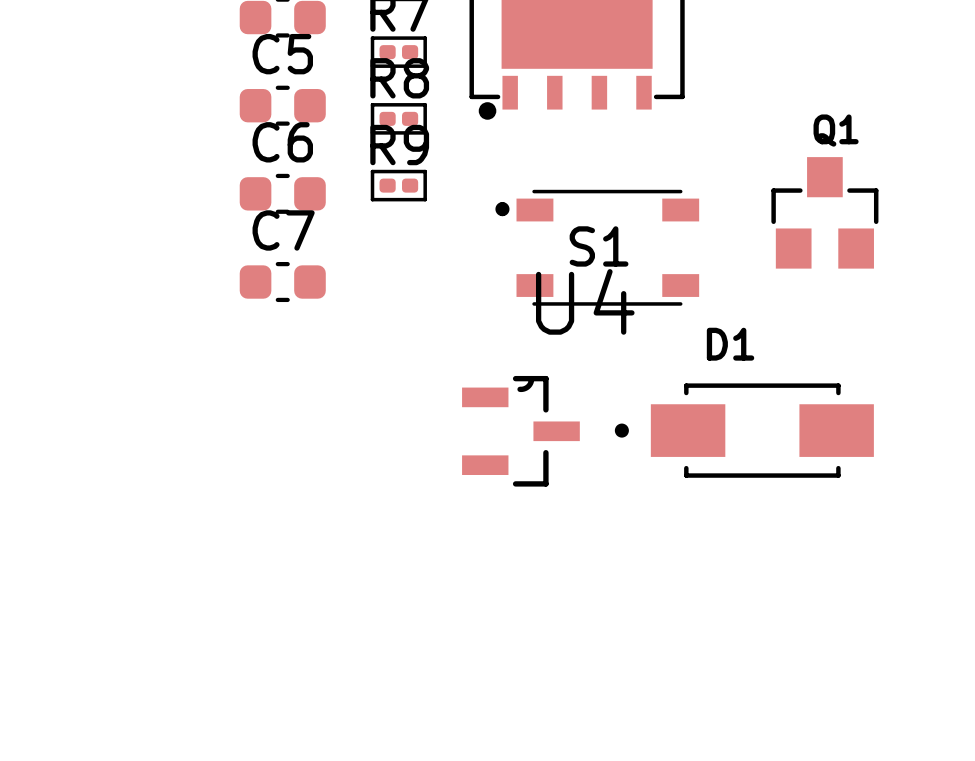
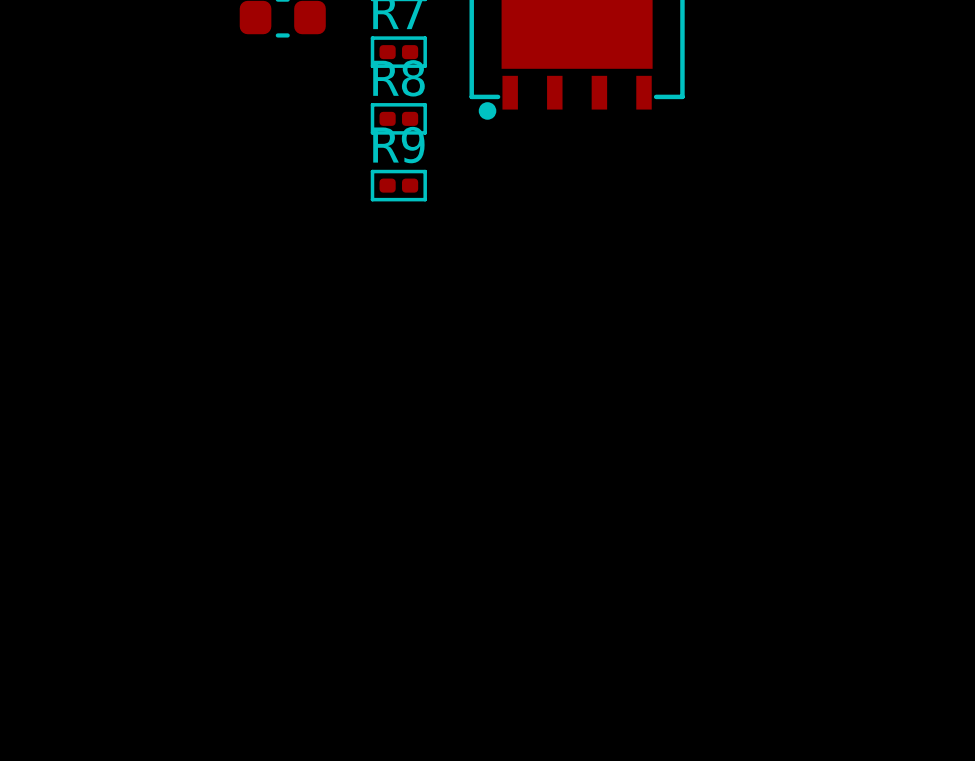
C5: (282, 105) -> none
C6: (282, 193) -> none
Q1: (824, 212) -> none
S1: (597, 247) -> none
C7: (282, 282) -> none
D1: (744, 430) -> none
U4: (520, 431) -> none

